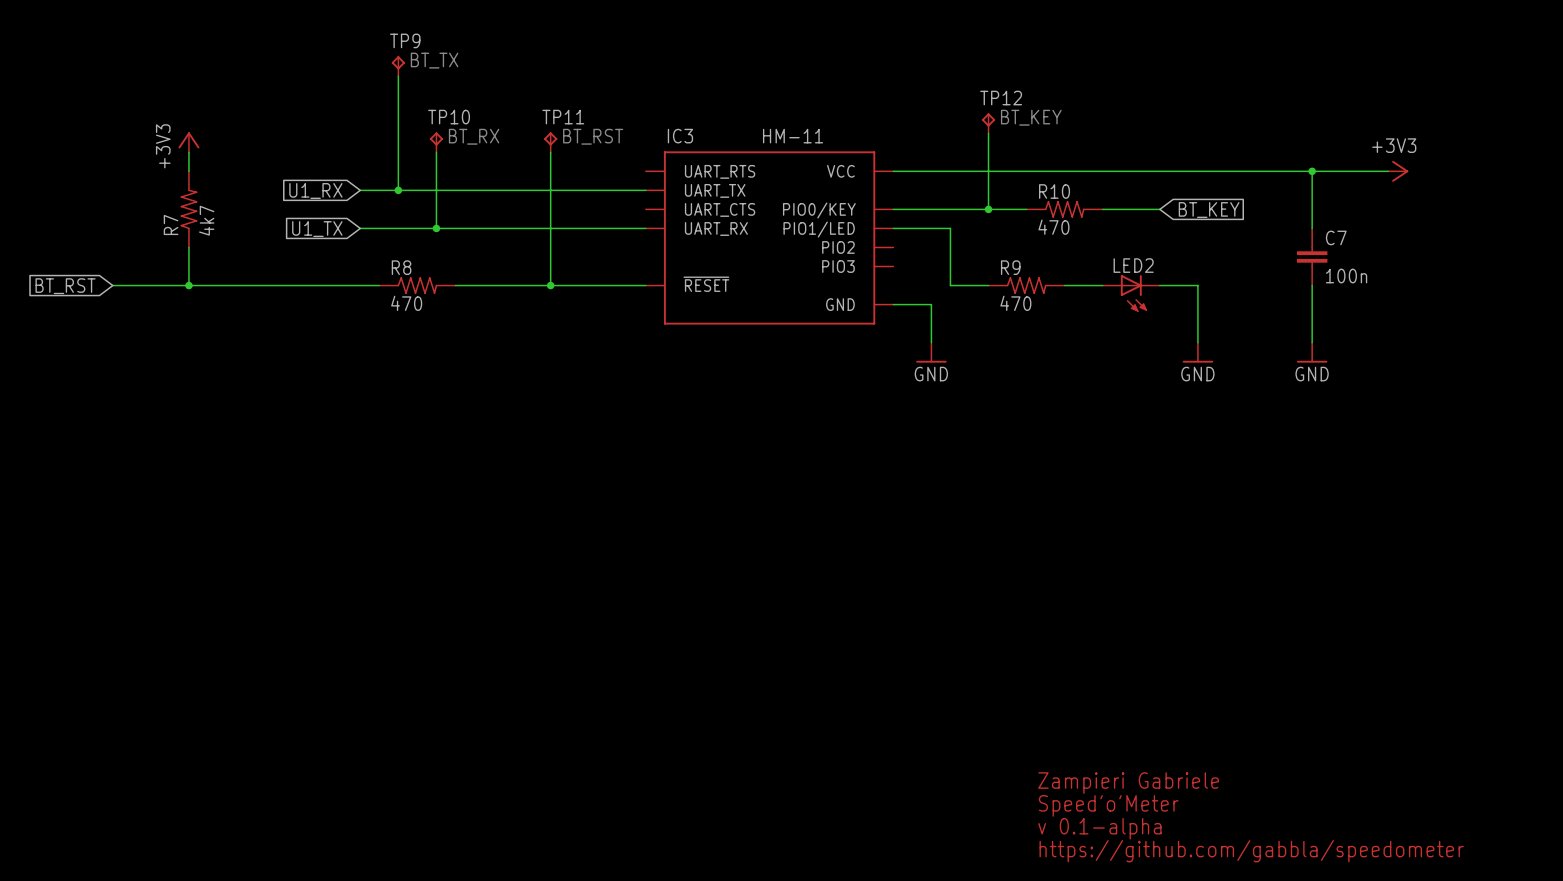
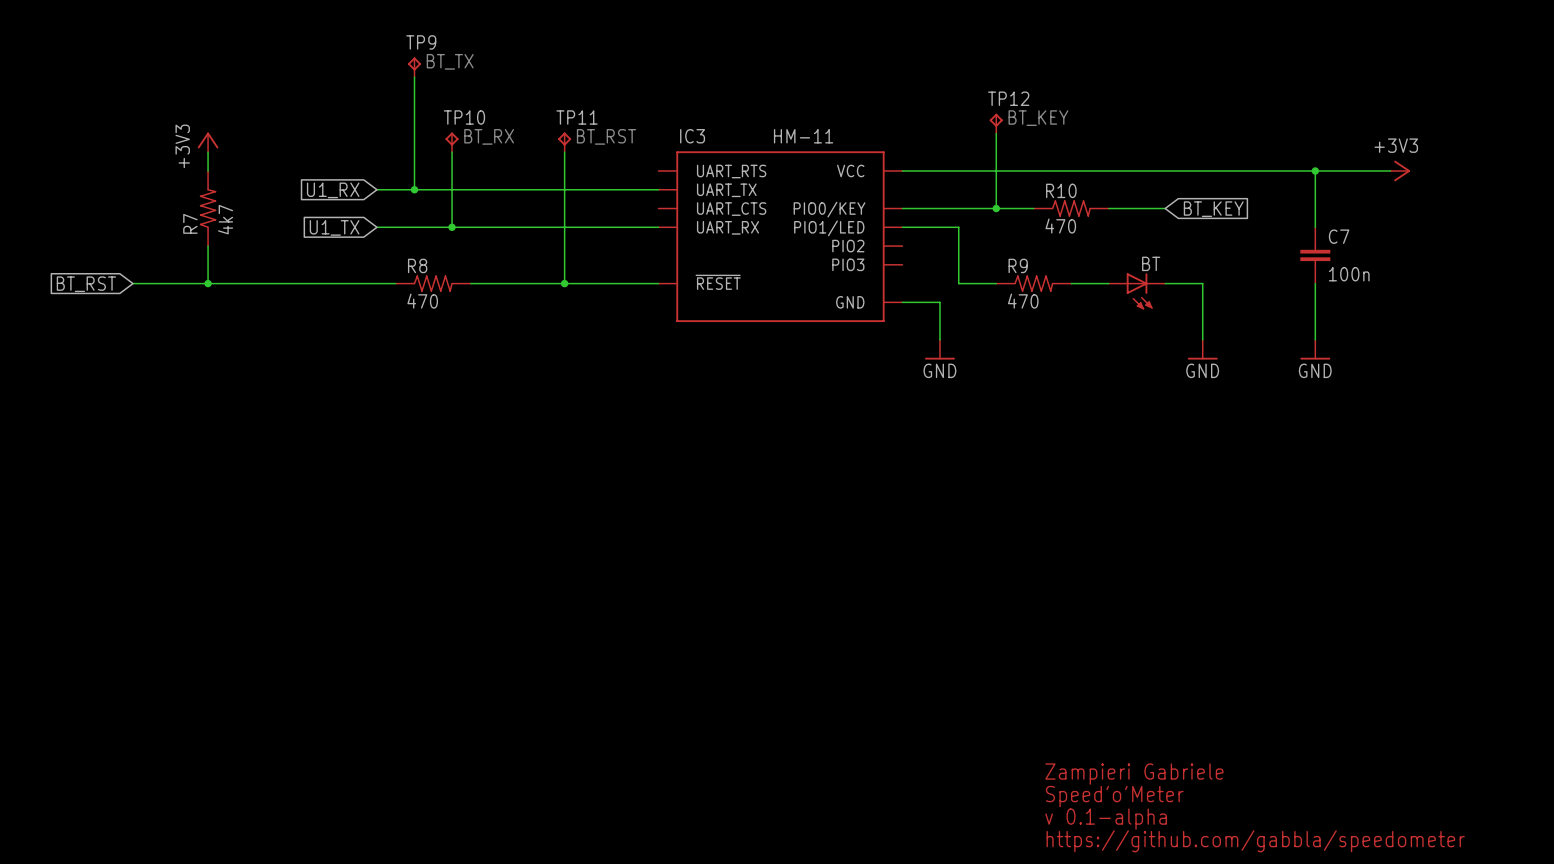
LED2 name: LED2 (1133, 265) -> BT (1151, 263)

